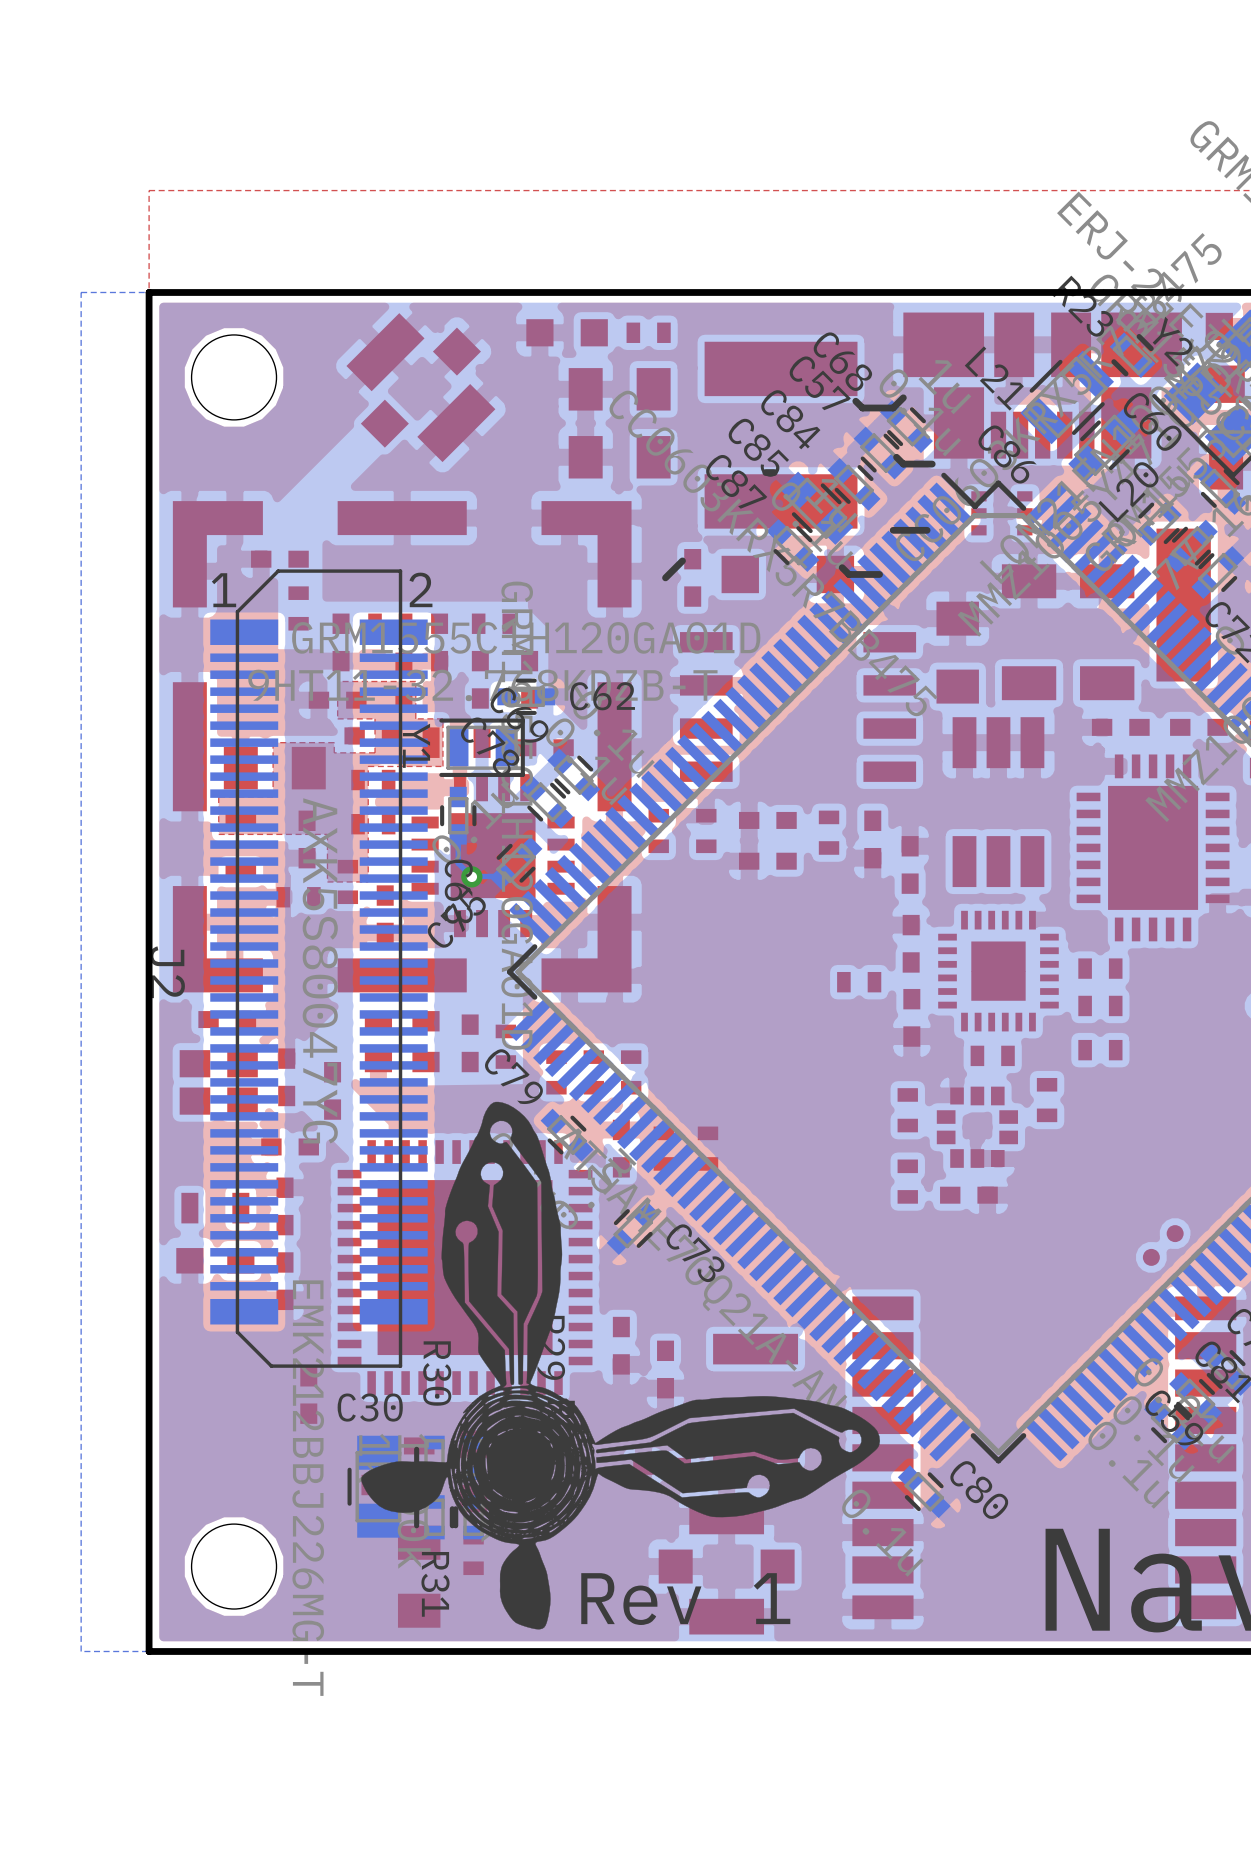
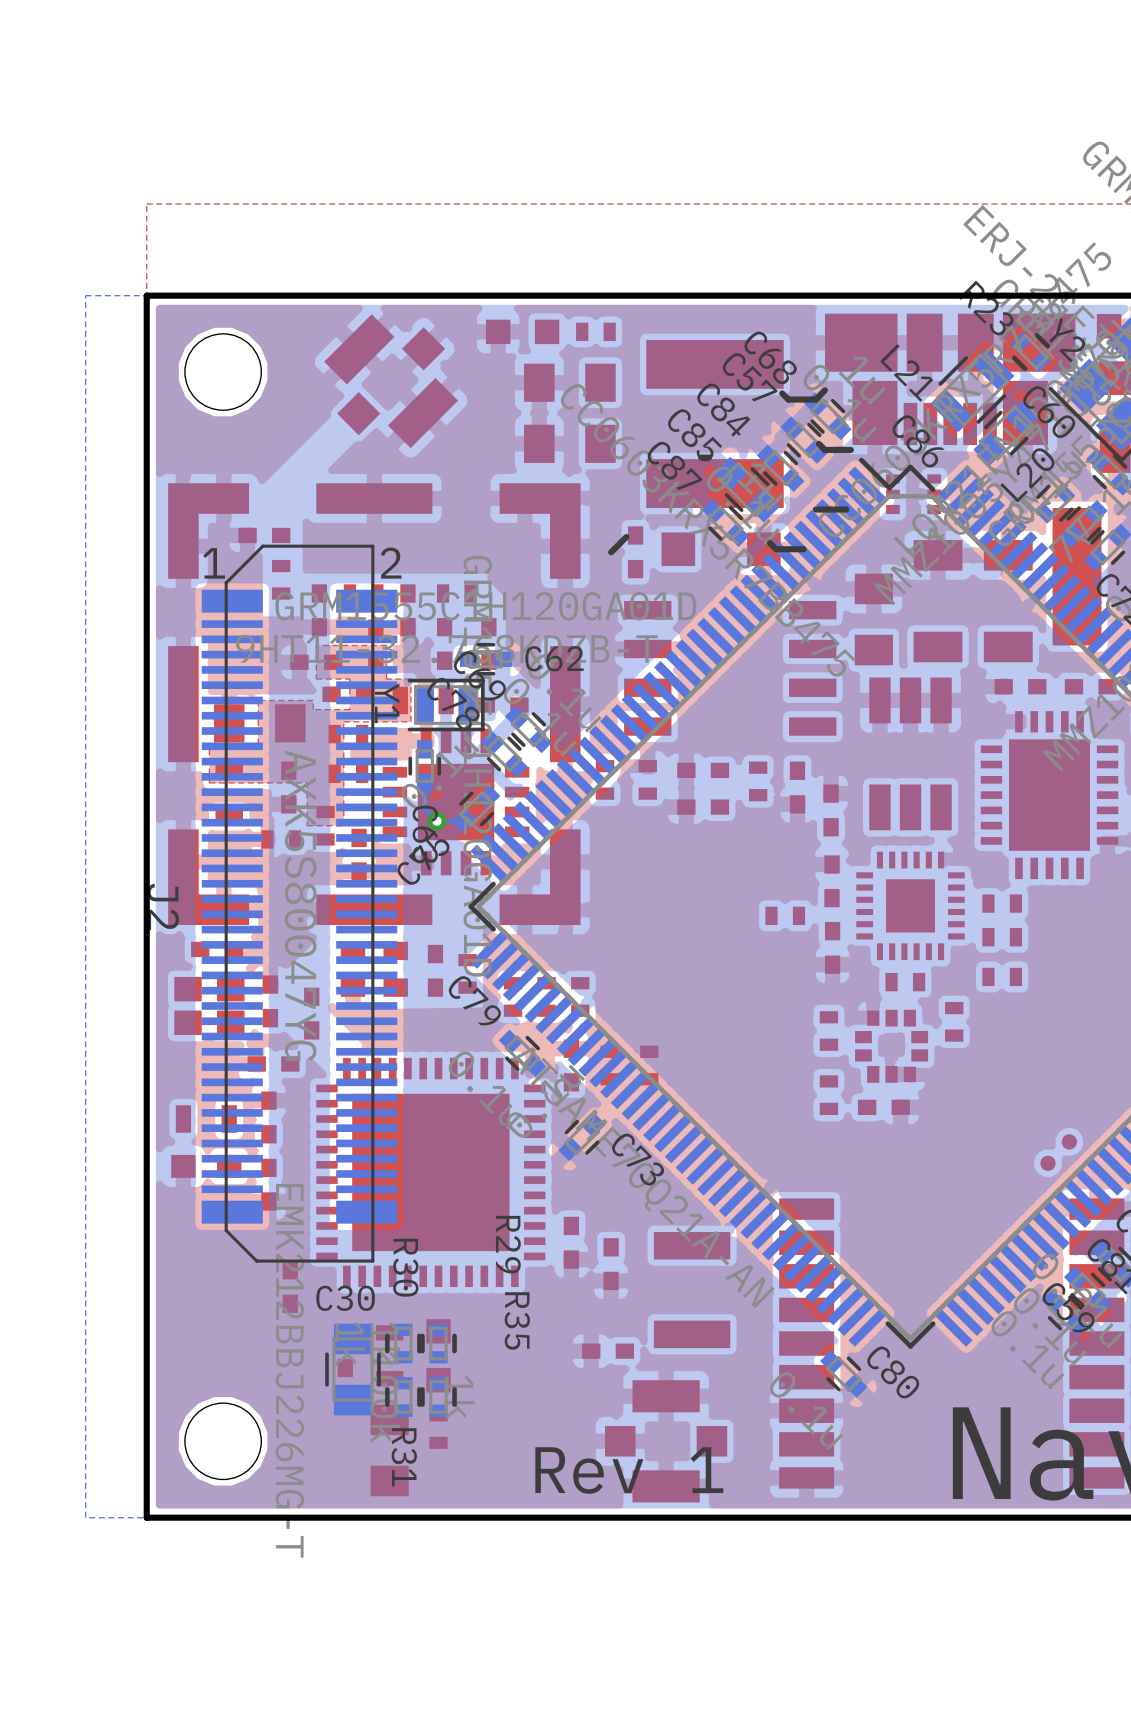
drawing: [361, 1101, 881, 1630] -> none

